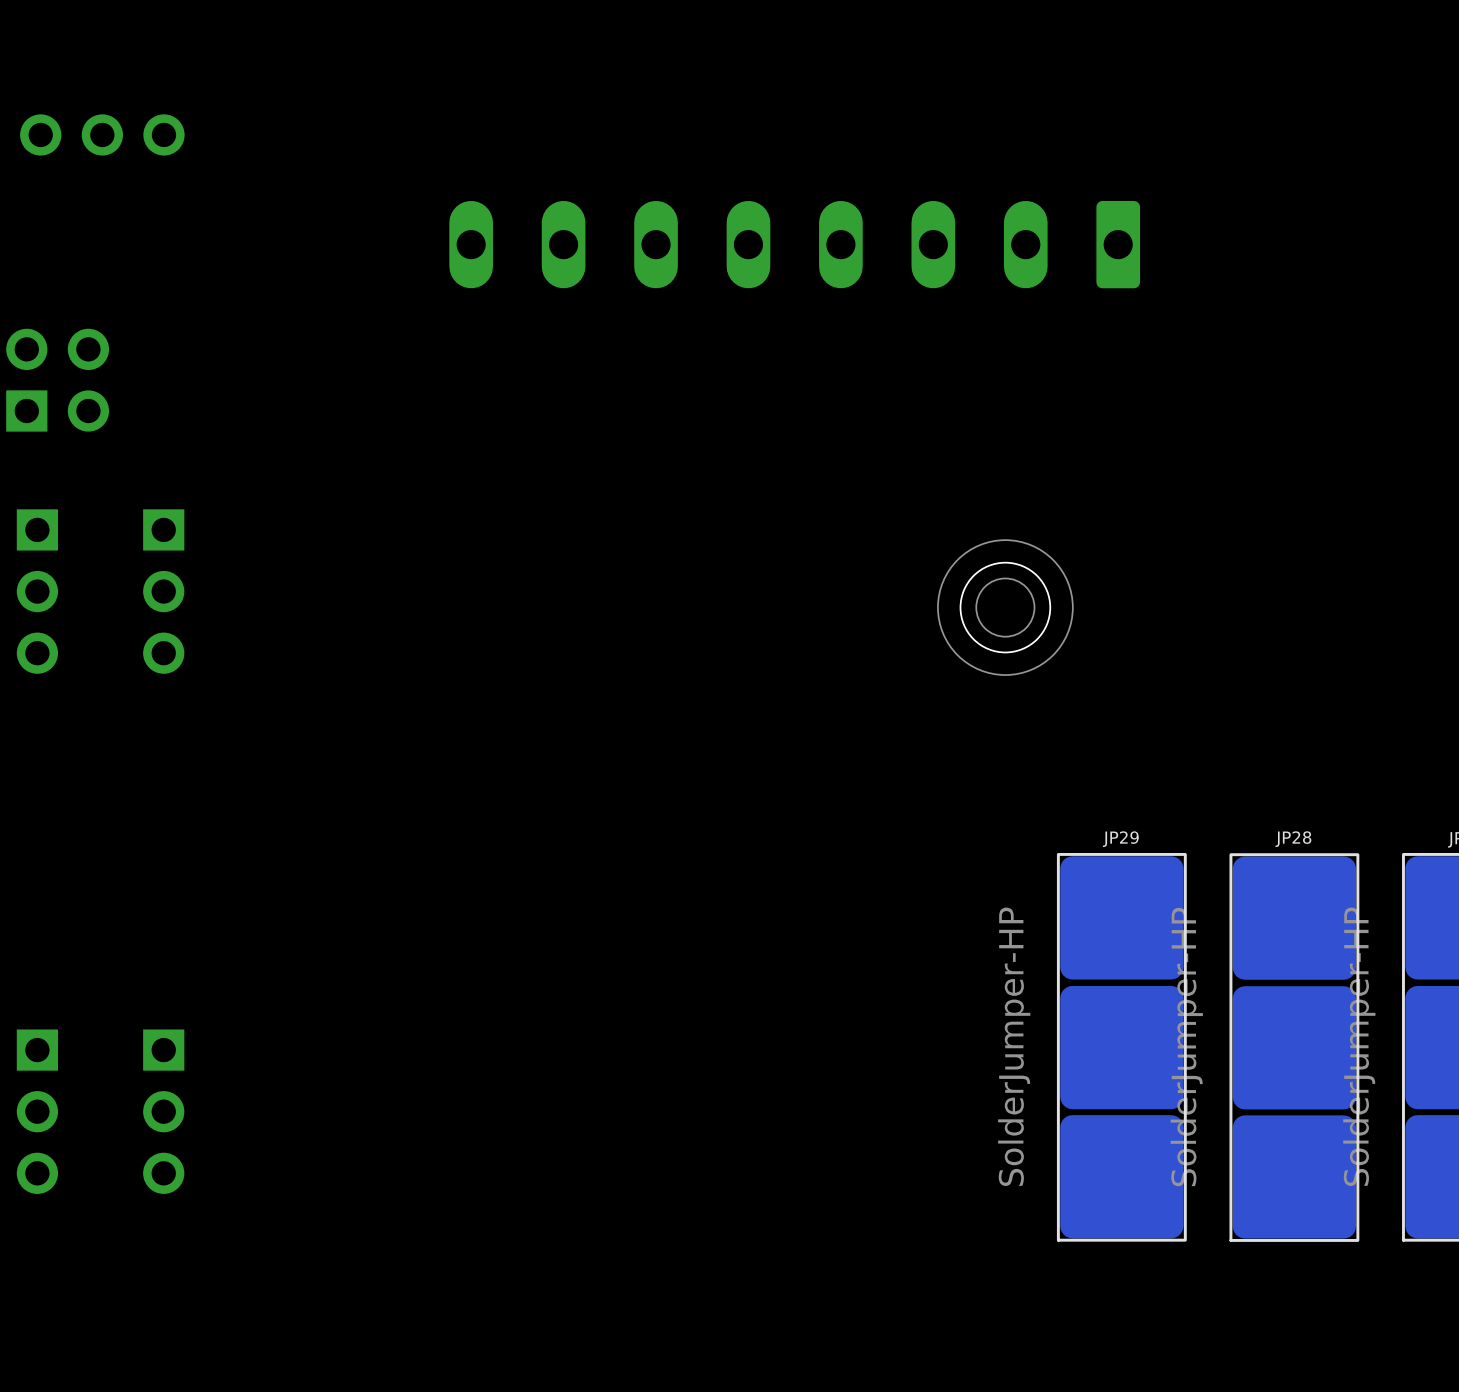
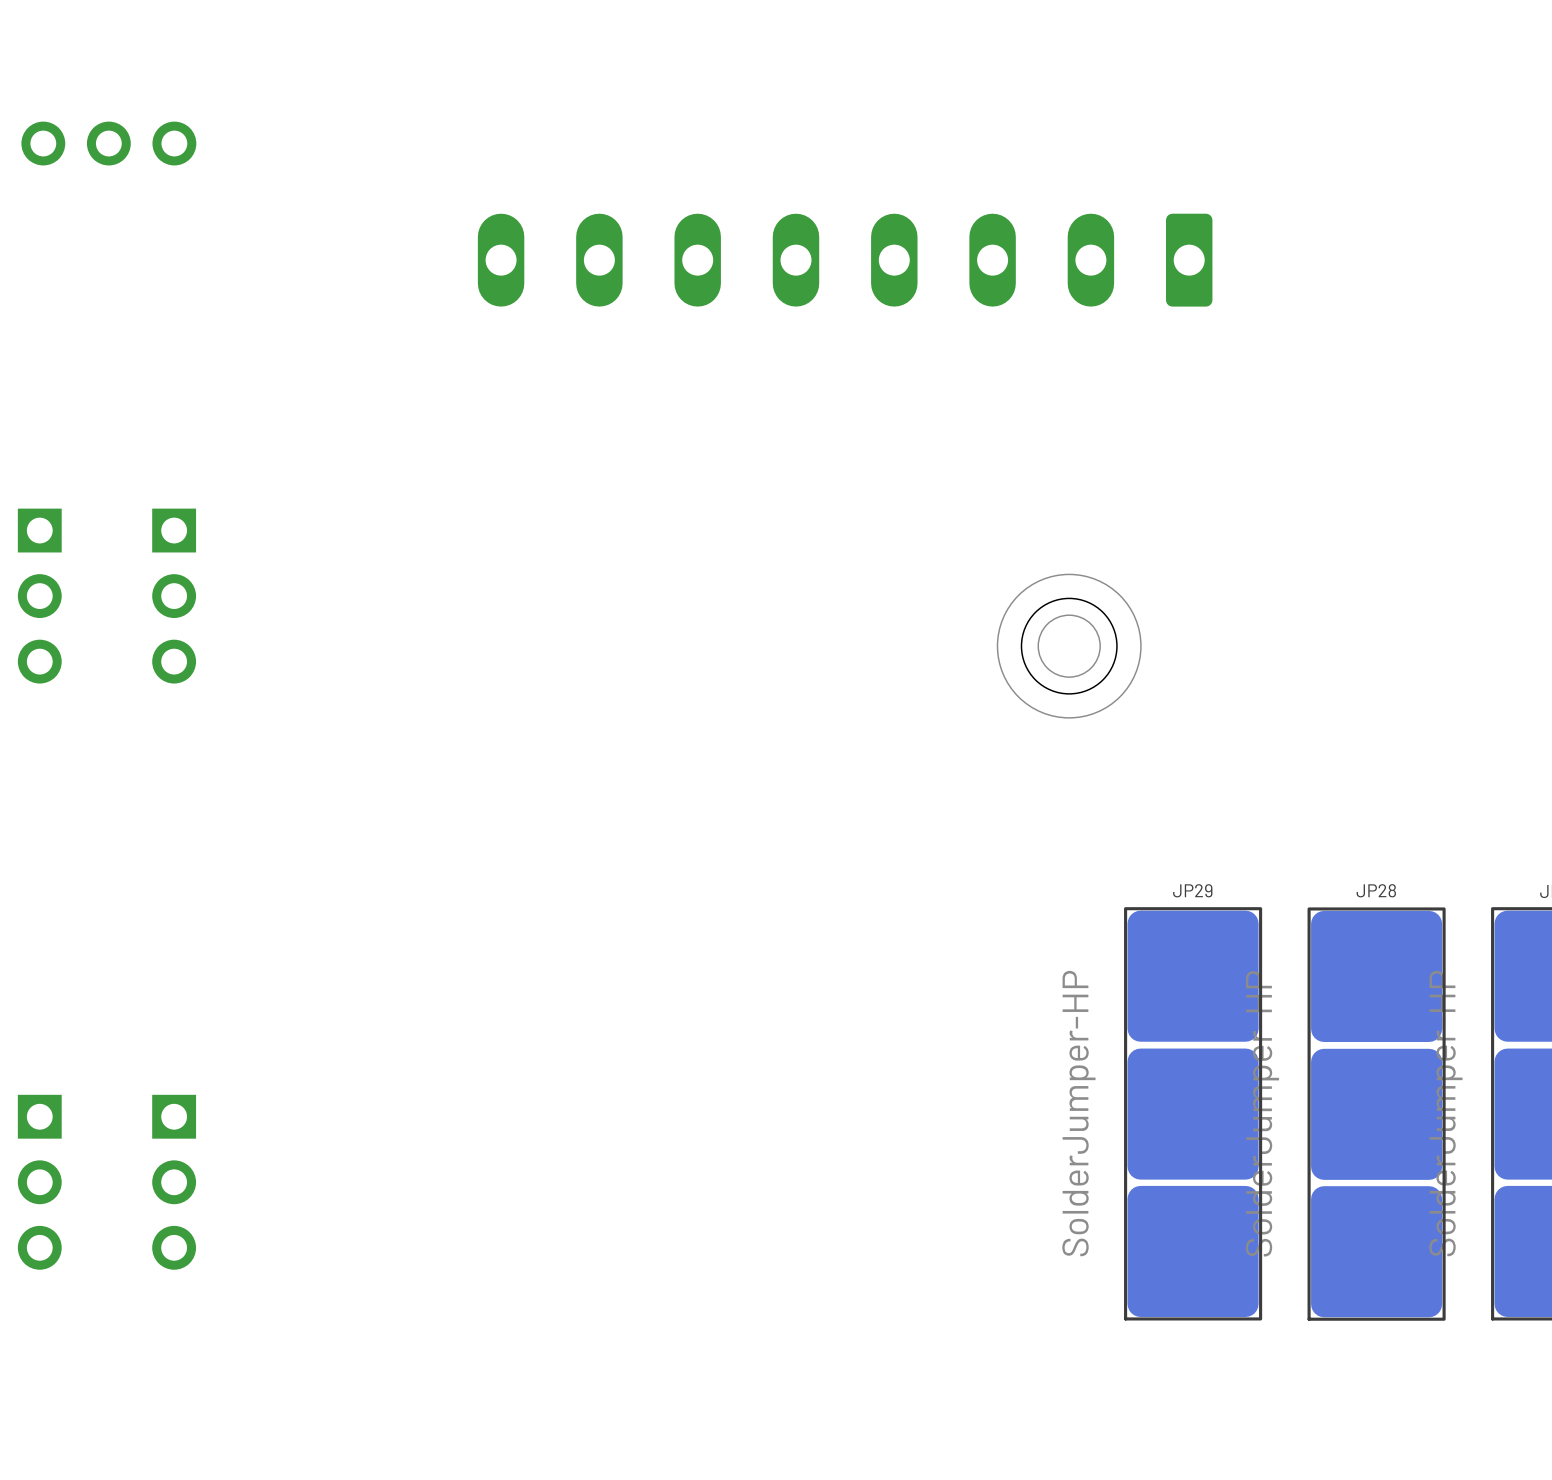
part: (57, 380) -> none
part position: (37, 591) -> (39, 596)
part position: (163, 591) -> (174, 596)

